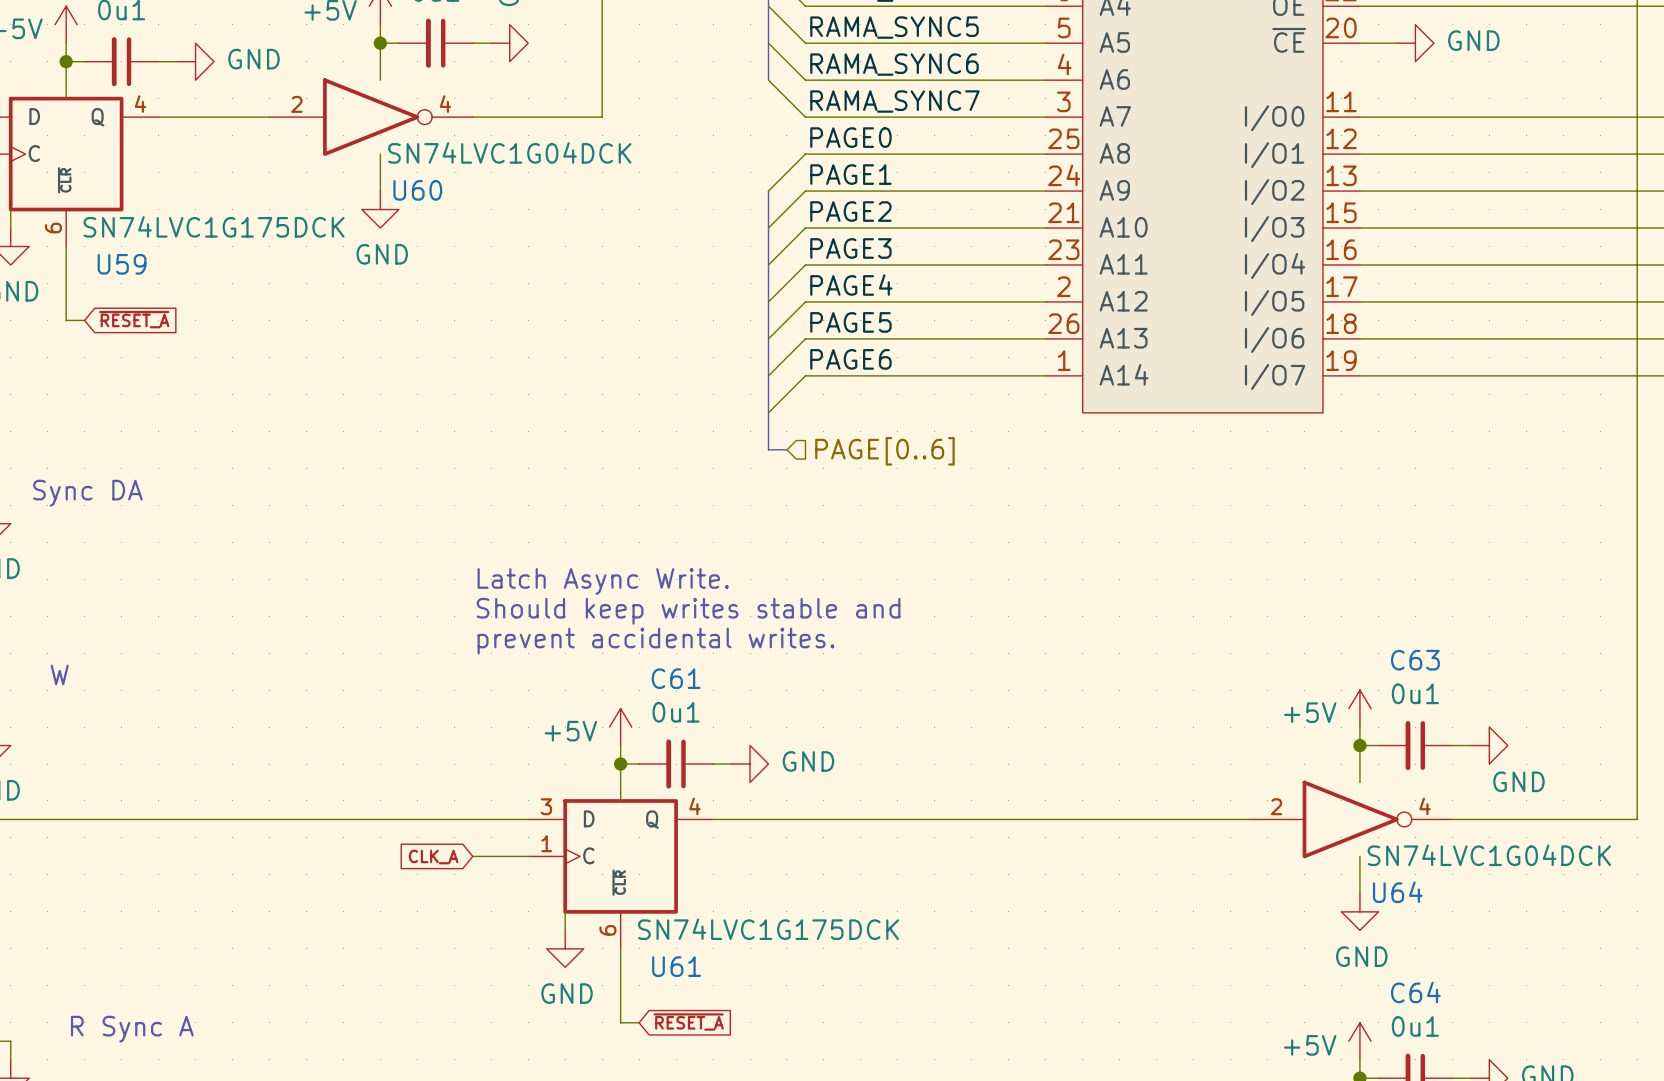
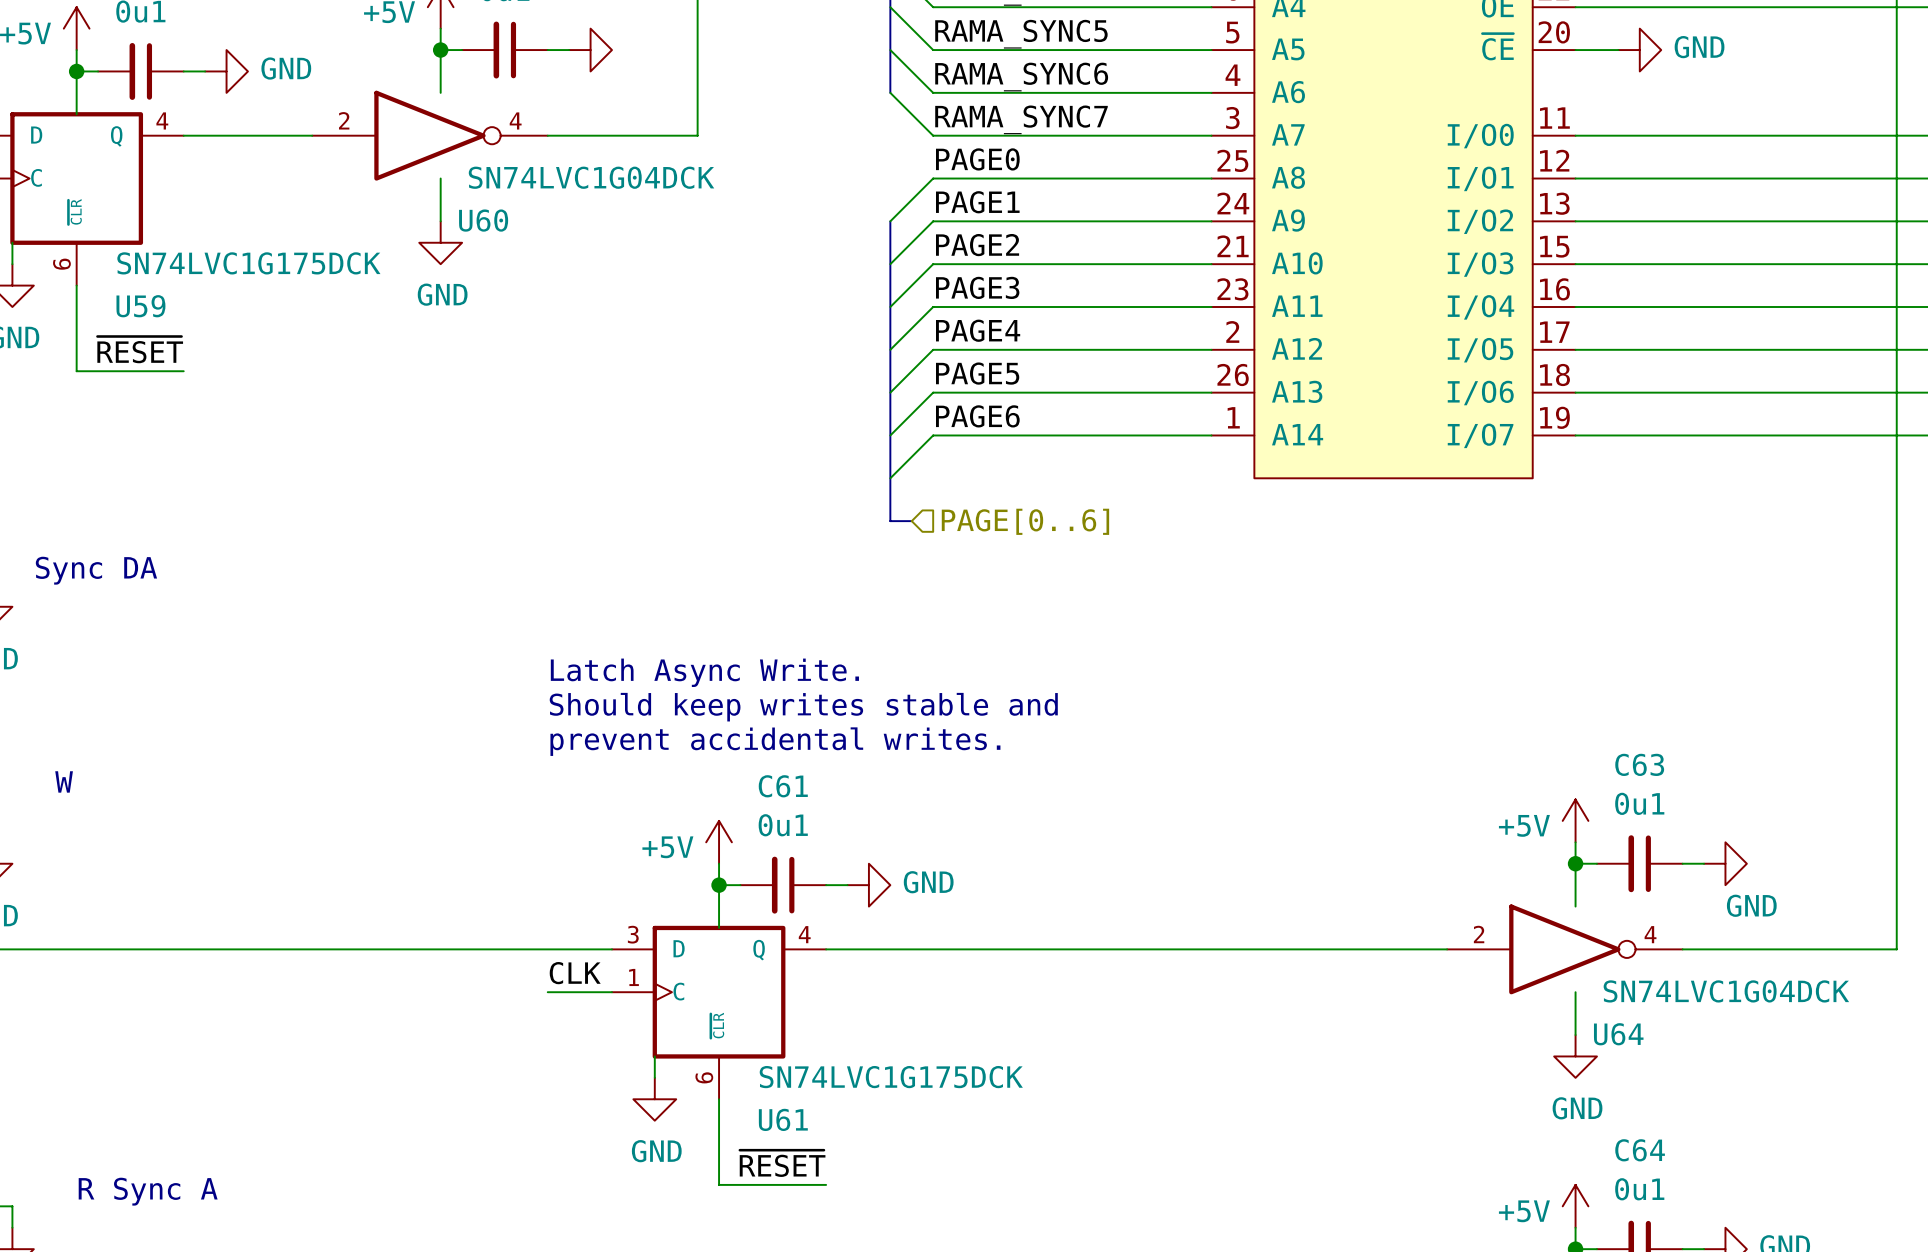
label: none -> ~{RESET} (140, 349)
global label: ~{RESET_A} (134, 319) -> none
wire: none -> (98, 371) (183, 371)
label: none -> CLK (575, 973)
global label: CLK_A (433, 856) -> none
label: none -> ~{RESET} (782, 1163)
wire: none -> (740, 1184) (826, 1184)
global label: ~{RESET_A} (688, 1022) -> none

